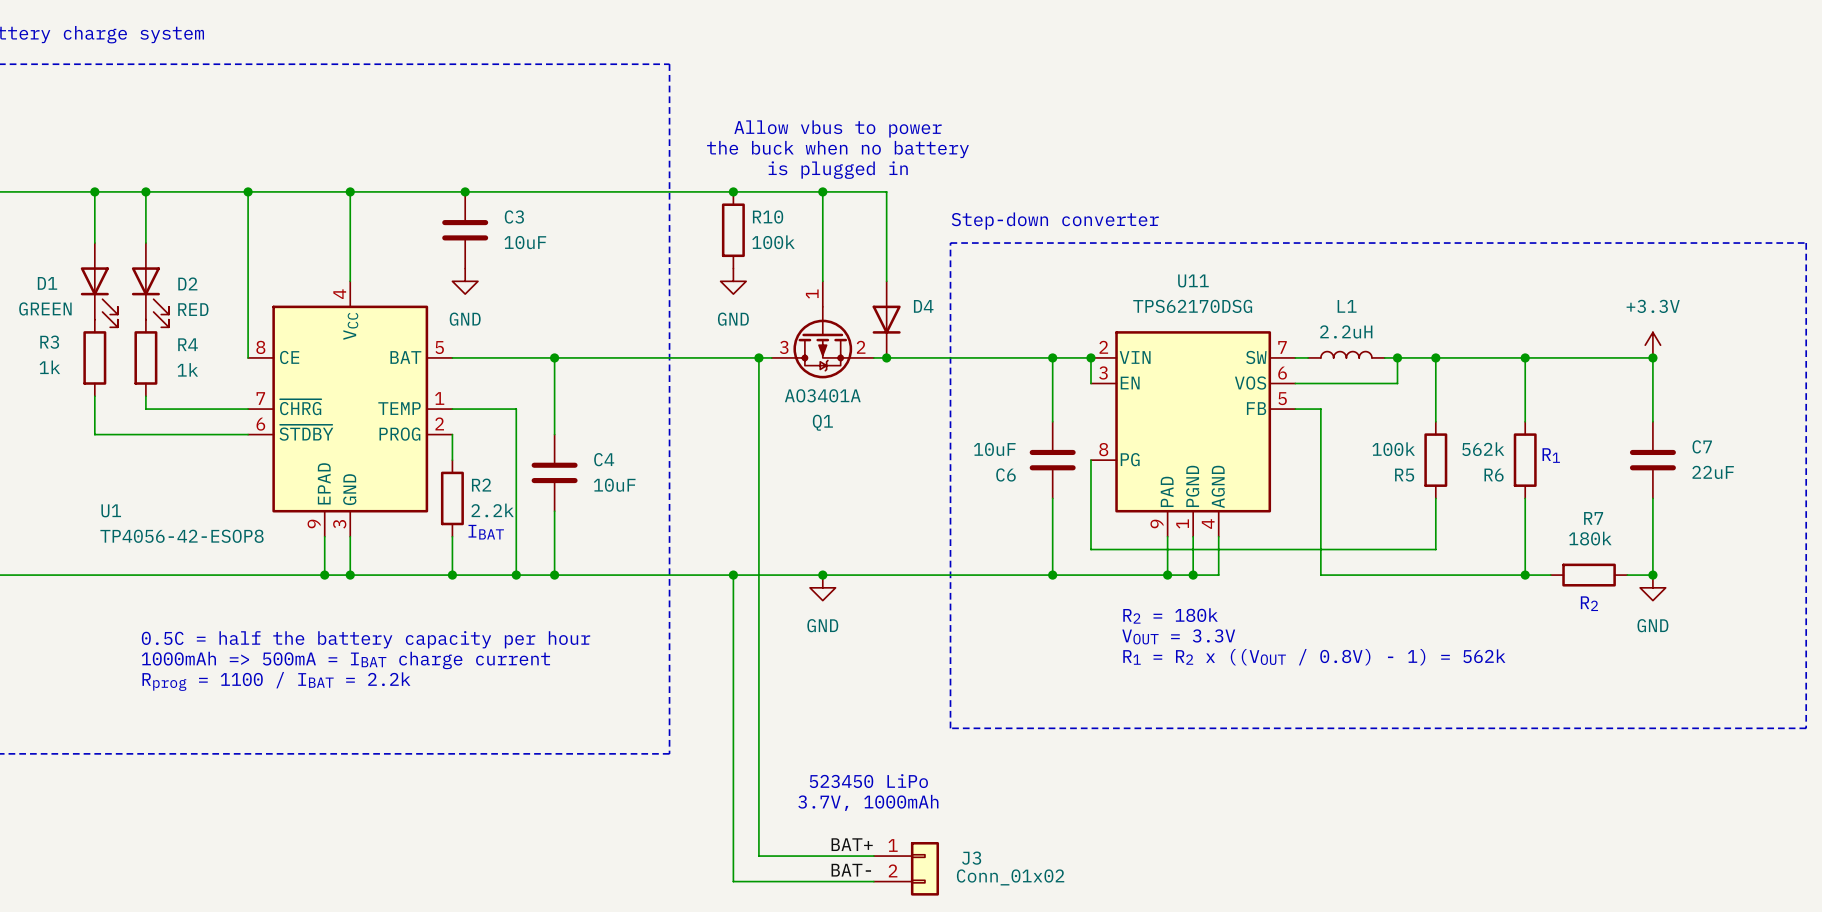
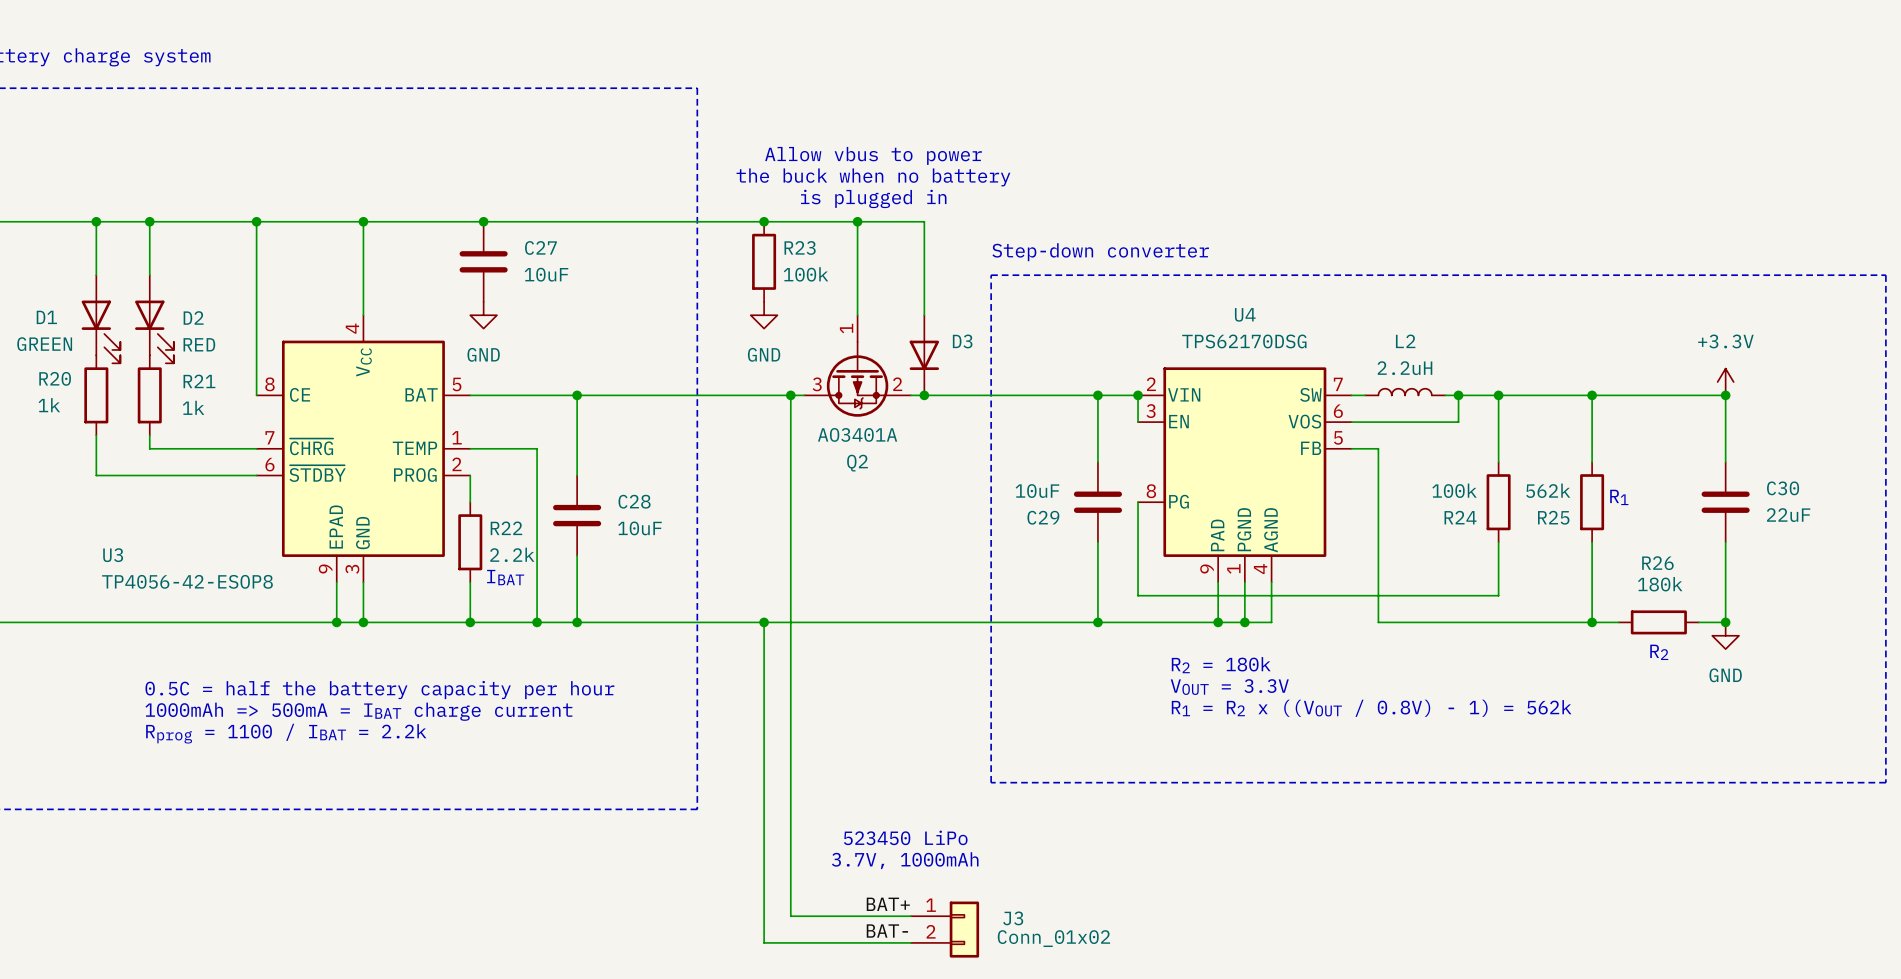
C3 name: C3 (514, 217) -> C27 (540, 247)
R10 name: R10 (768, 217) -> R23 (800, 247)
U11 name: U11 (1193, 280) -> U4 (1245, 314)
D4 name: D4 (923, 306) -> D3 (962, 341)
L1 name: L1 (1347, 306) -> L2 (1405, 341)
R3 name: R3 (49, 342) -> R20 (55, 378)
R4 name: R4 (188, 344) -> R21 (199, 381)
Q1 name: Q1 (822, 422) -> Q2 (857, 463)
C7 name: C7 (1702, 446) -> C30 (1783, 488)
C4 name: C4 (604, 459) -> C28 (634, 501)
C6 name: C6 (1005, 474) -> C29 (1043, 517)
R5 name: R5 (1404, 475) -> R24 (1460, 517)
R6 name: R6 (1494, 475) -> R25 (1553, 517)
R2 name: R2 (481, 485) -> R22 (506, 528)
U1 name: U1 (111, 510) -> U3 (113, 555)
R7 name: R7 (1593, 518) -> R26 (1657, 563)
junction: (822, 575) -> none
power symbol: GND (822, 587) -> none

